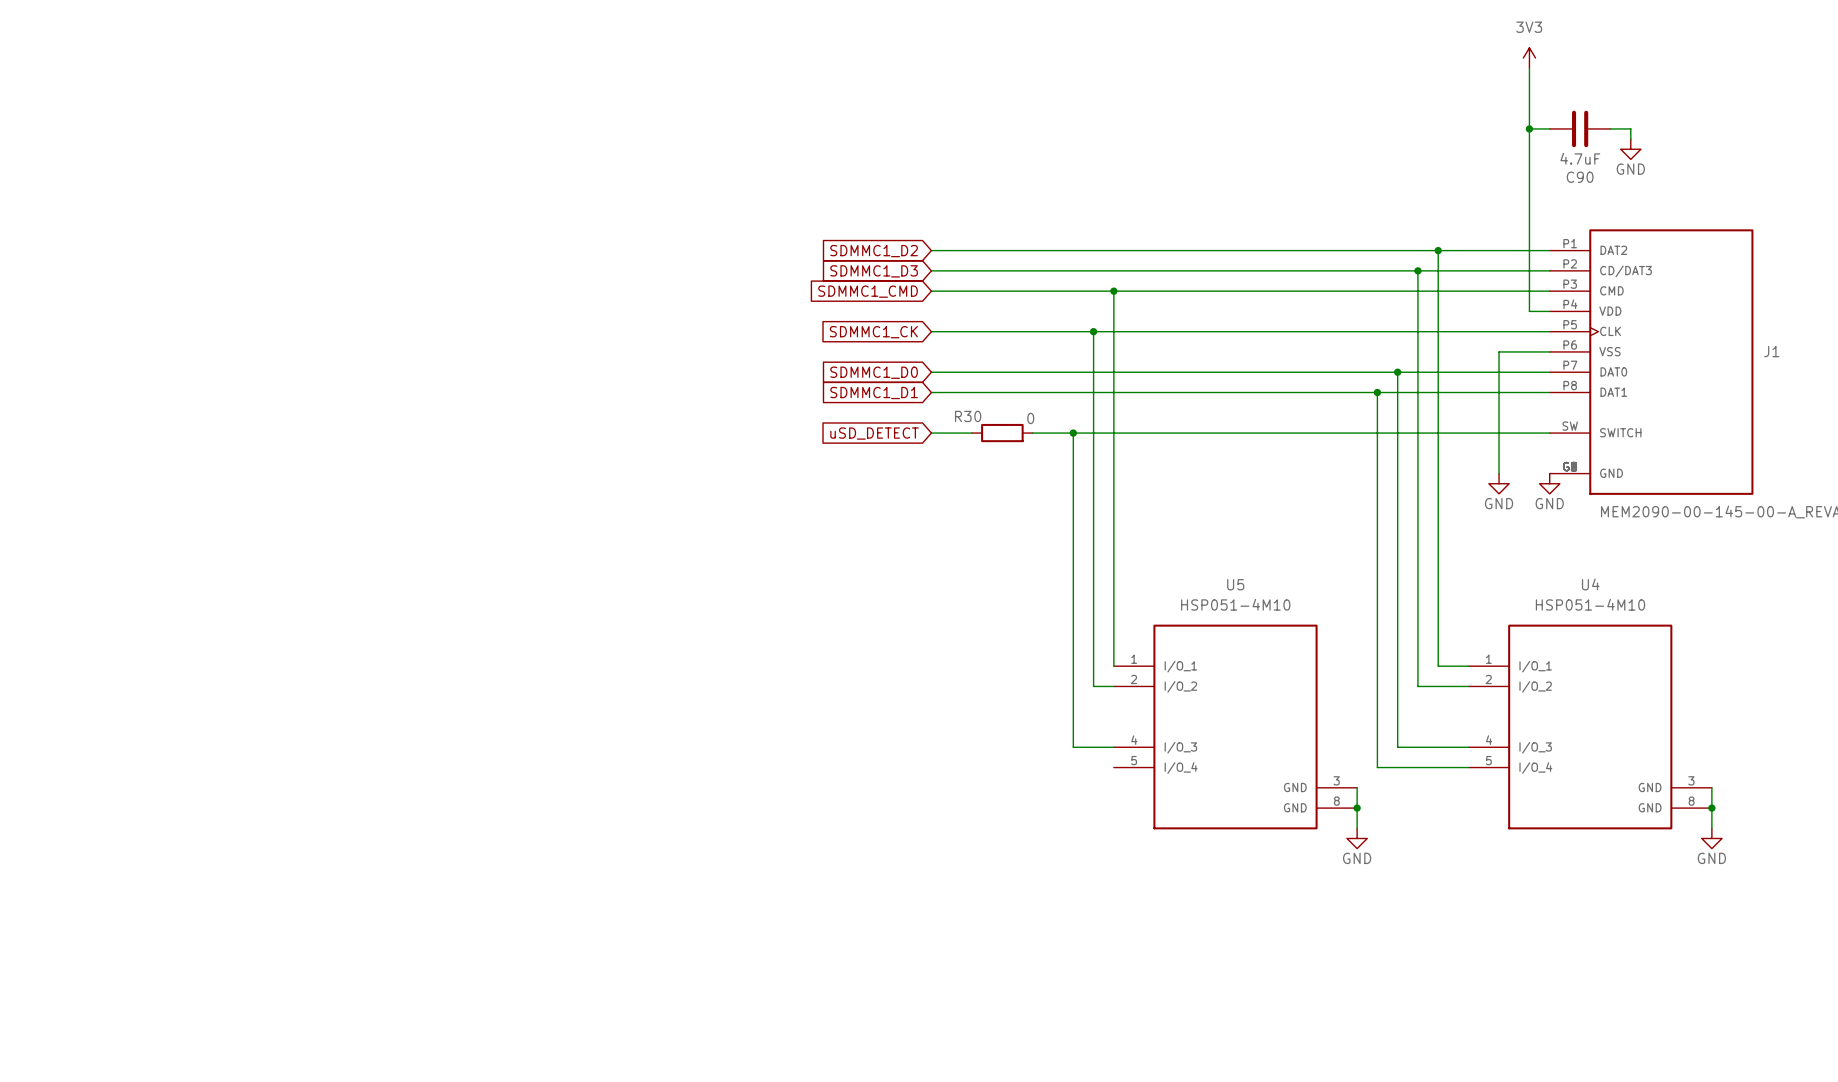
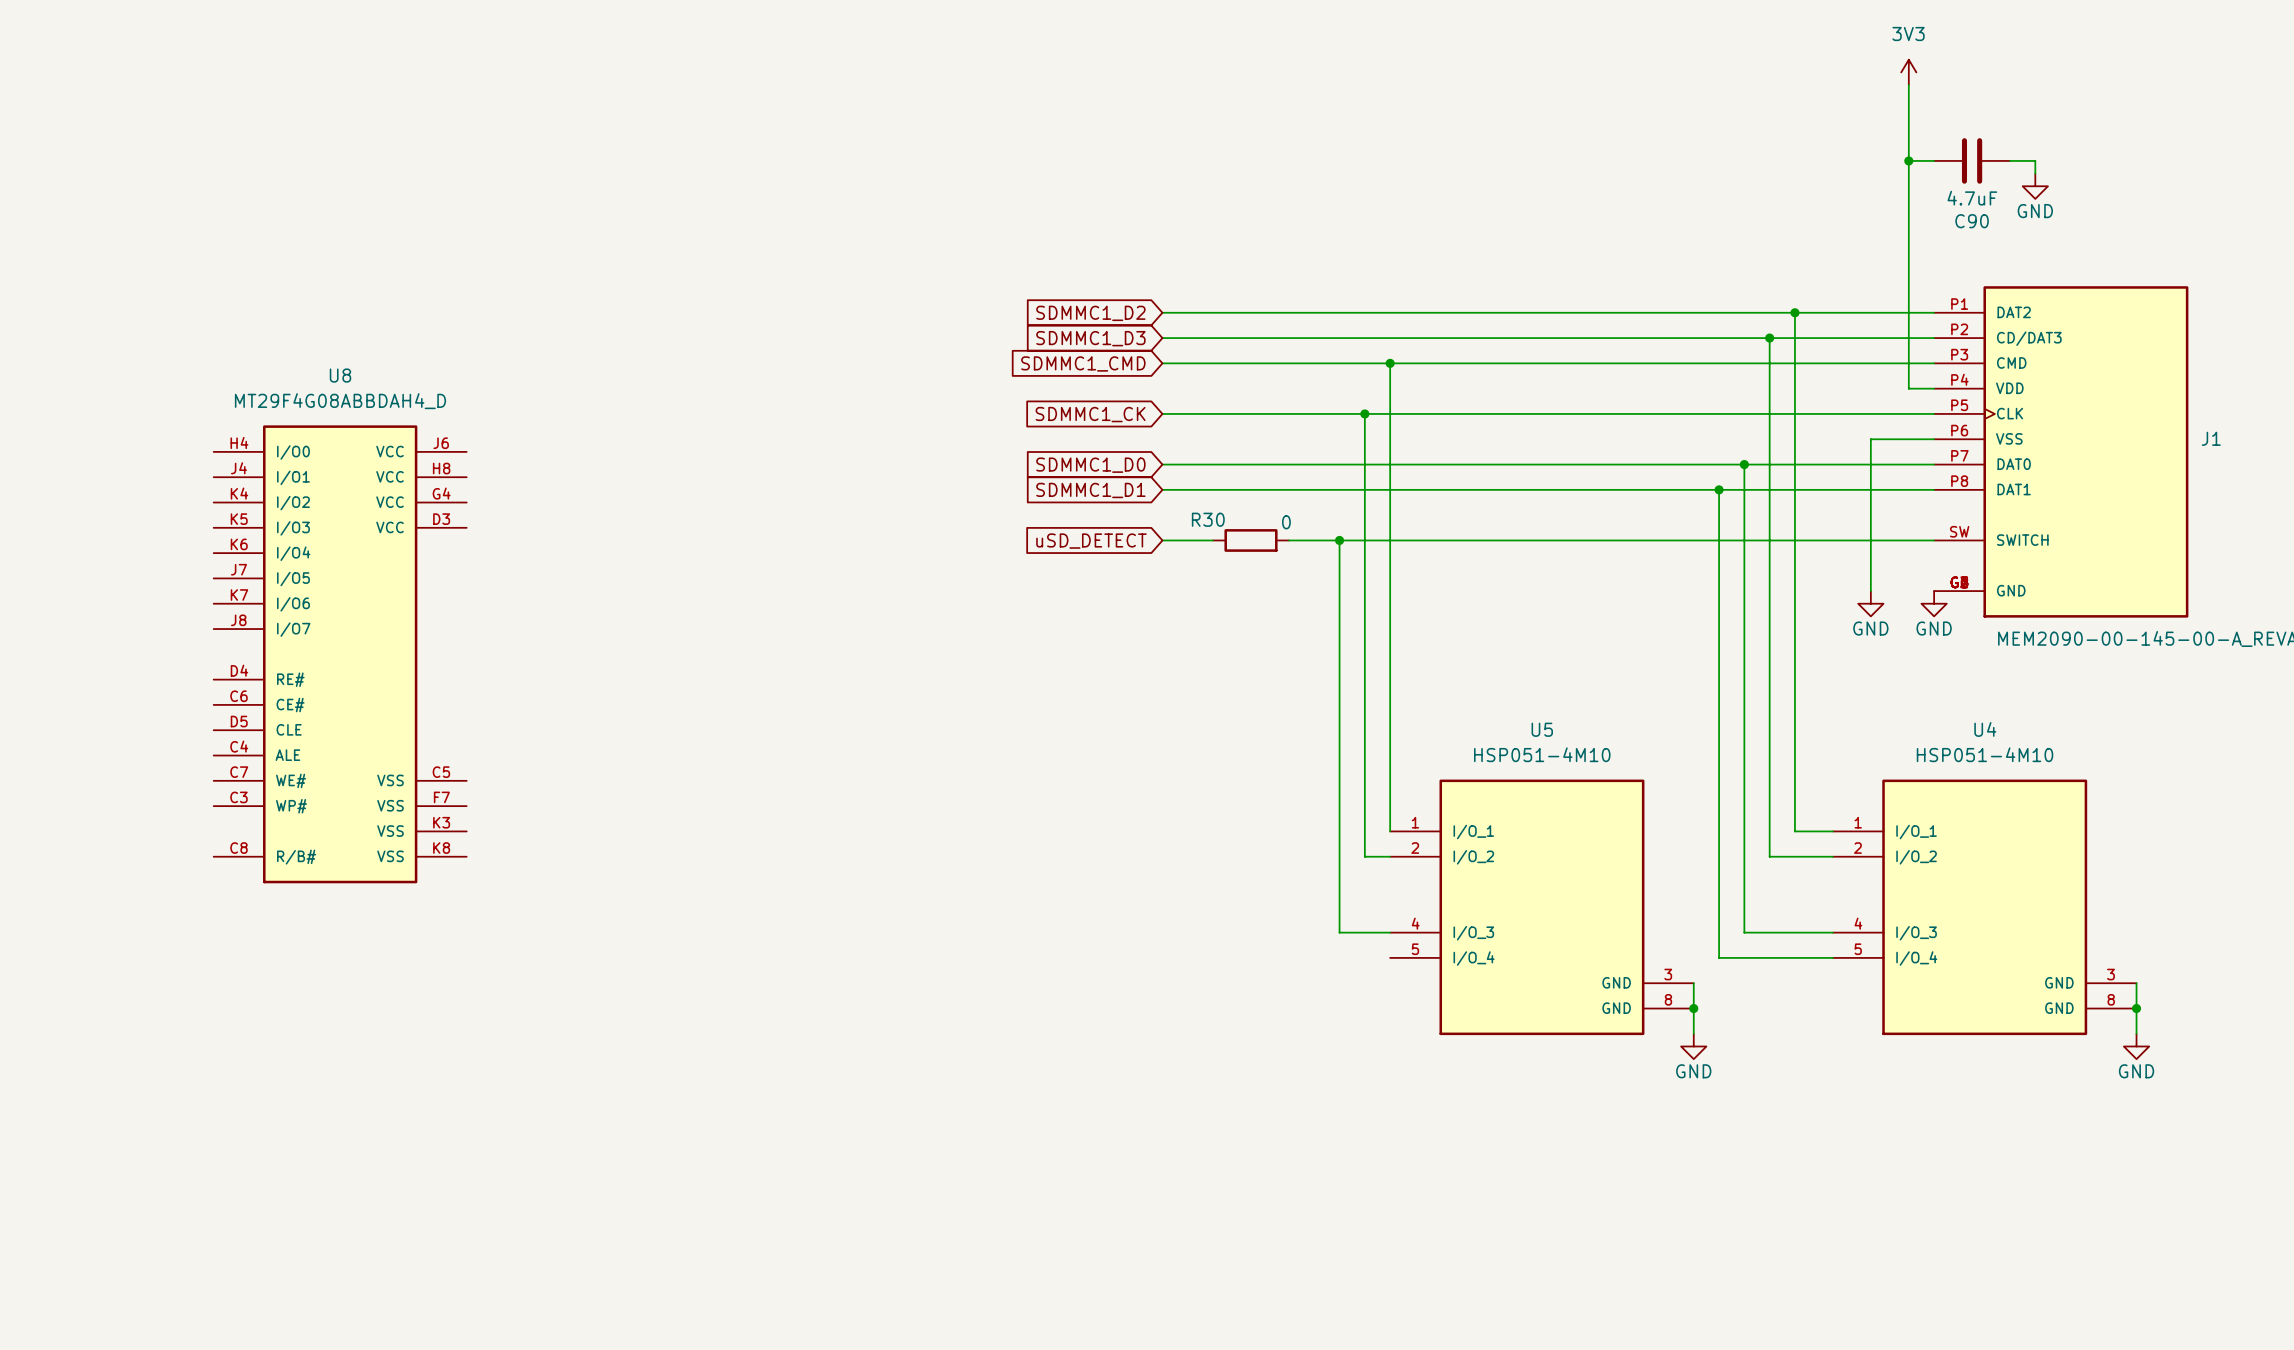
U8: none -> MT29F4G08ABBDAH4_D (340, 654)

